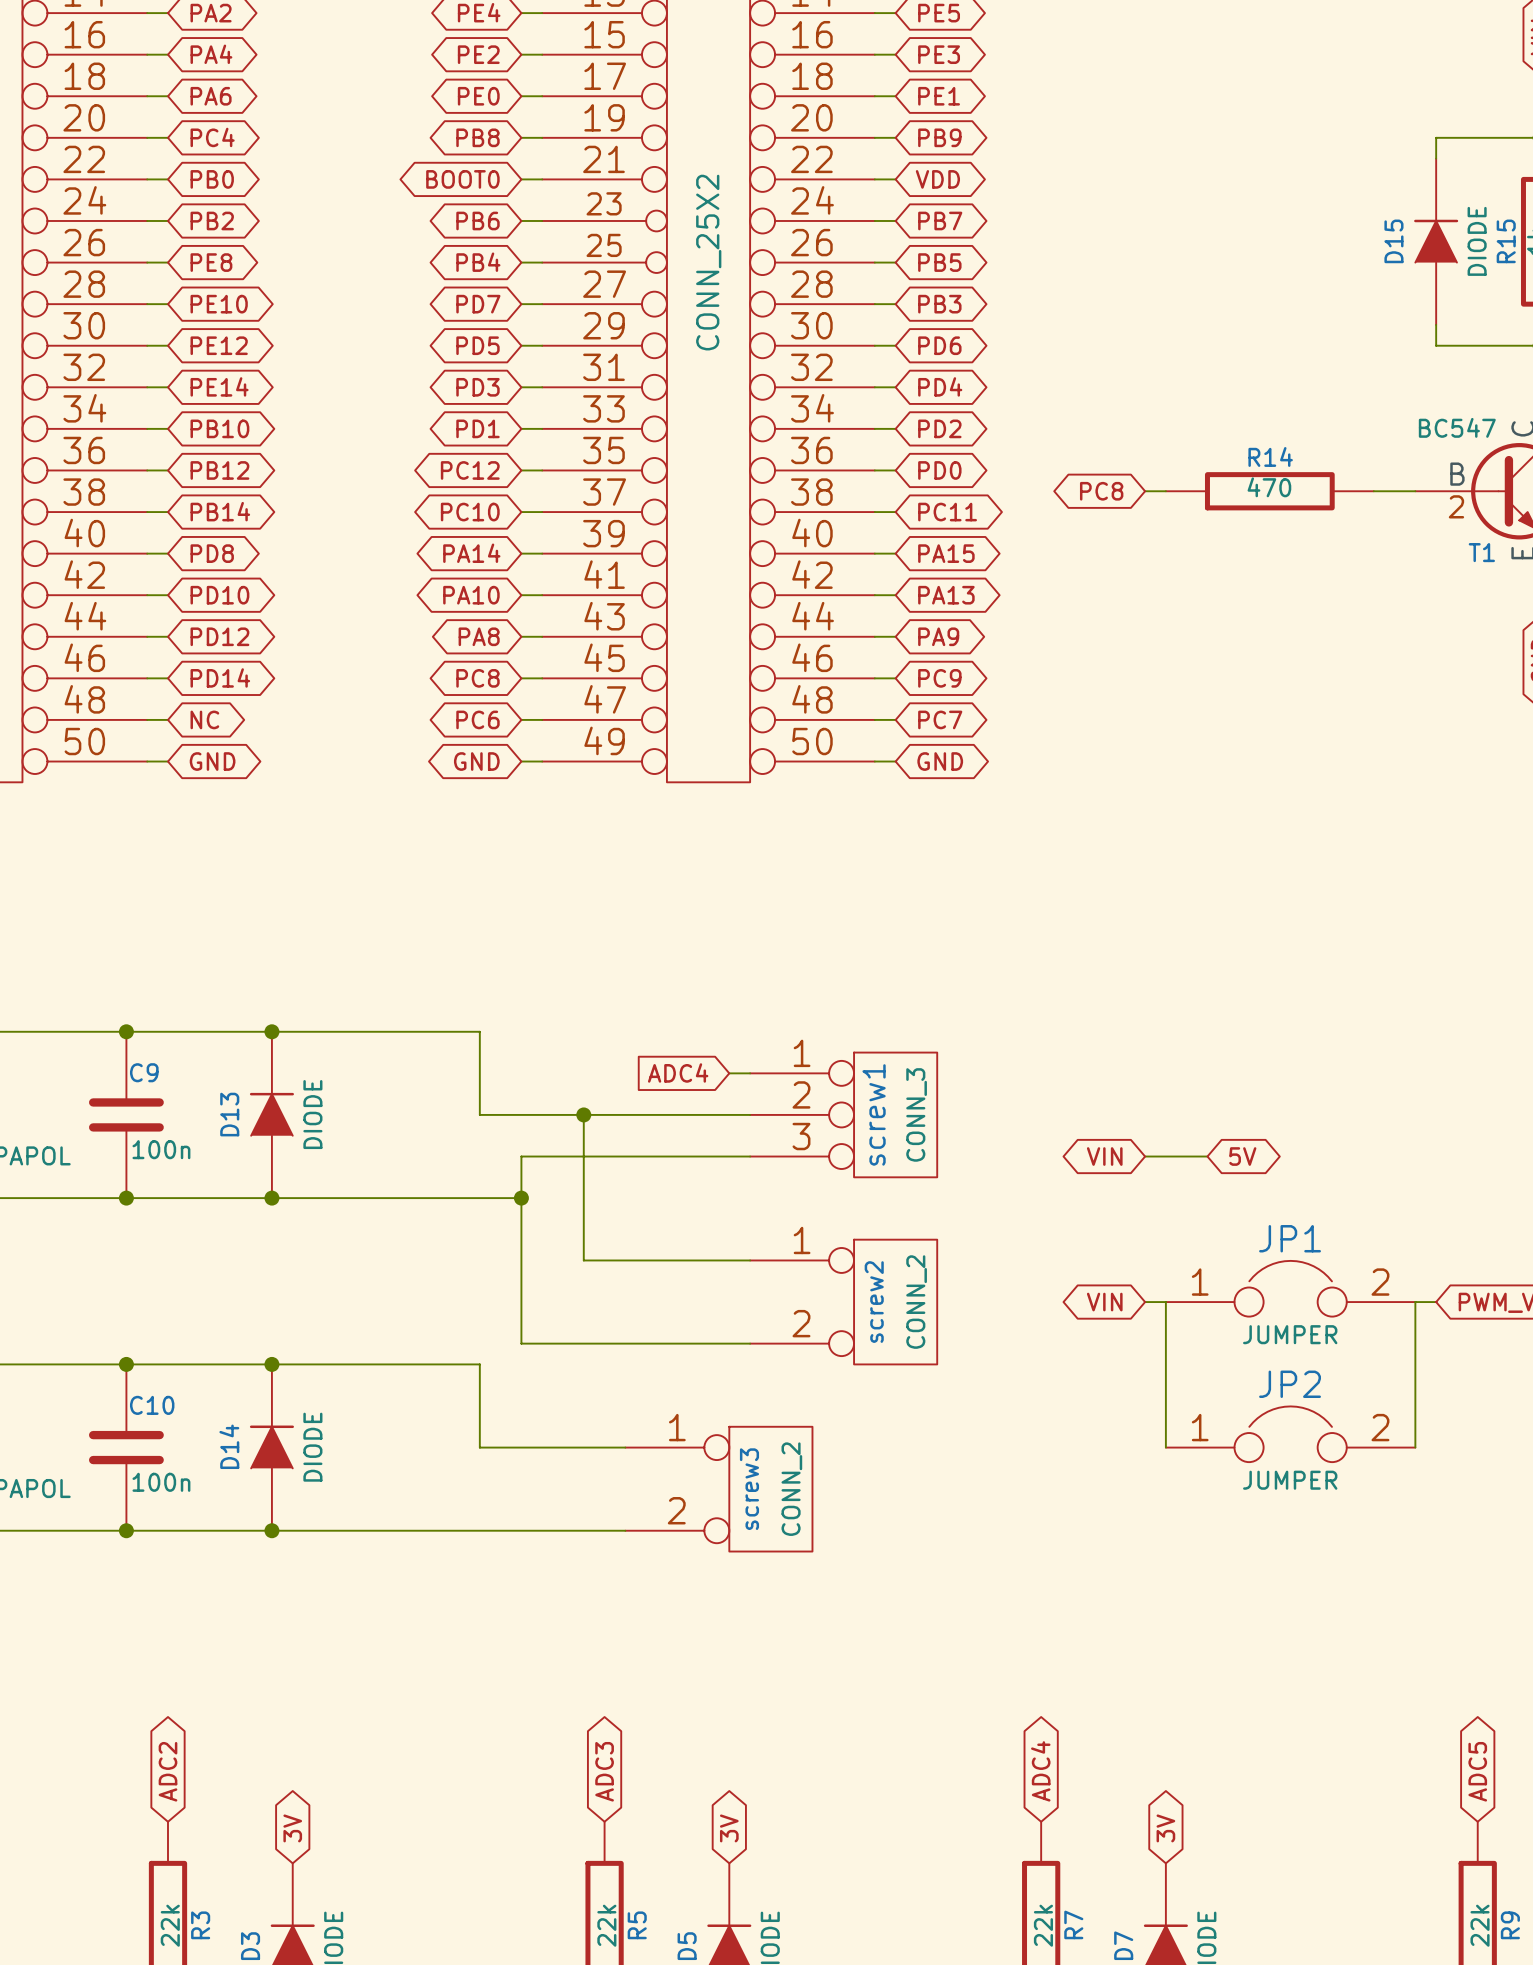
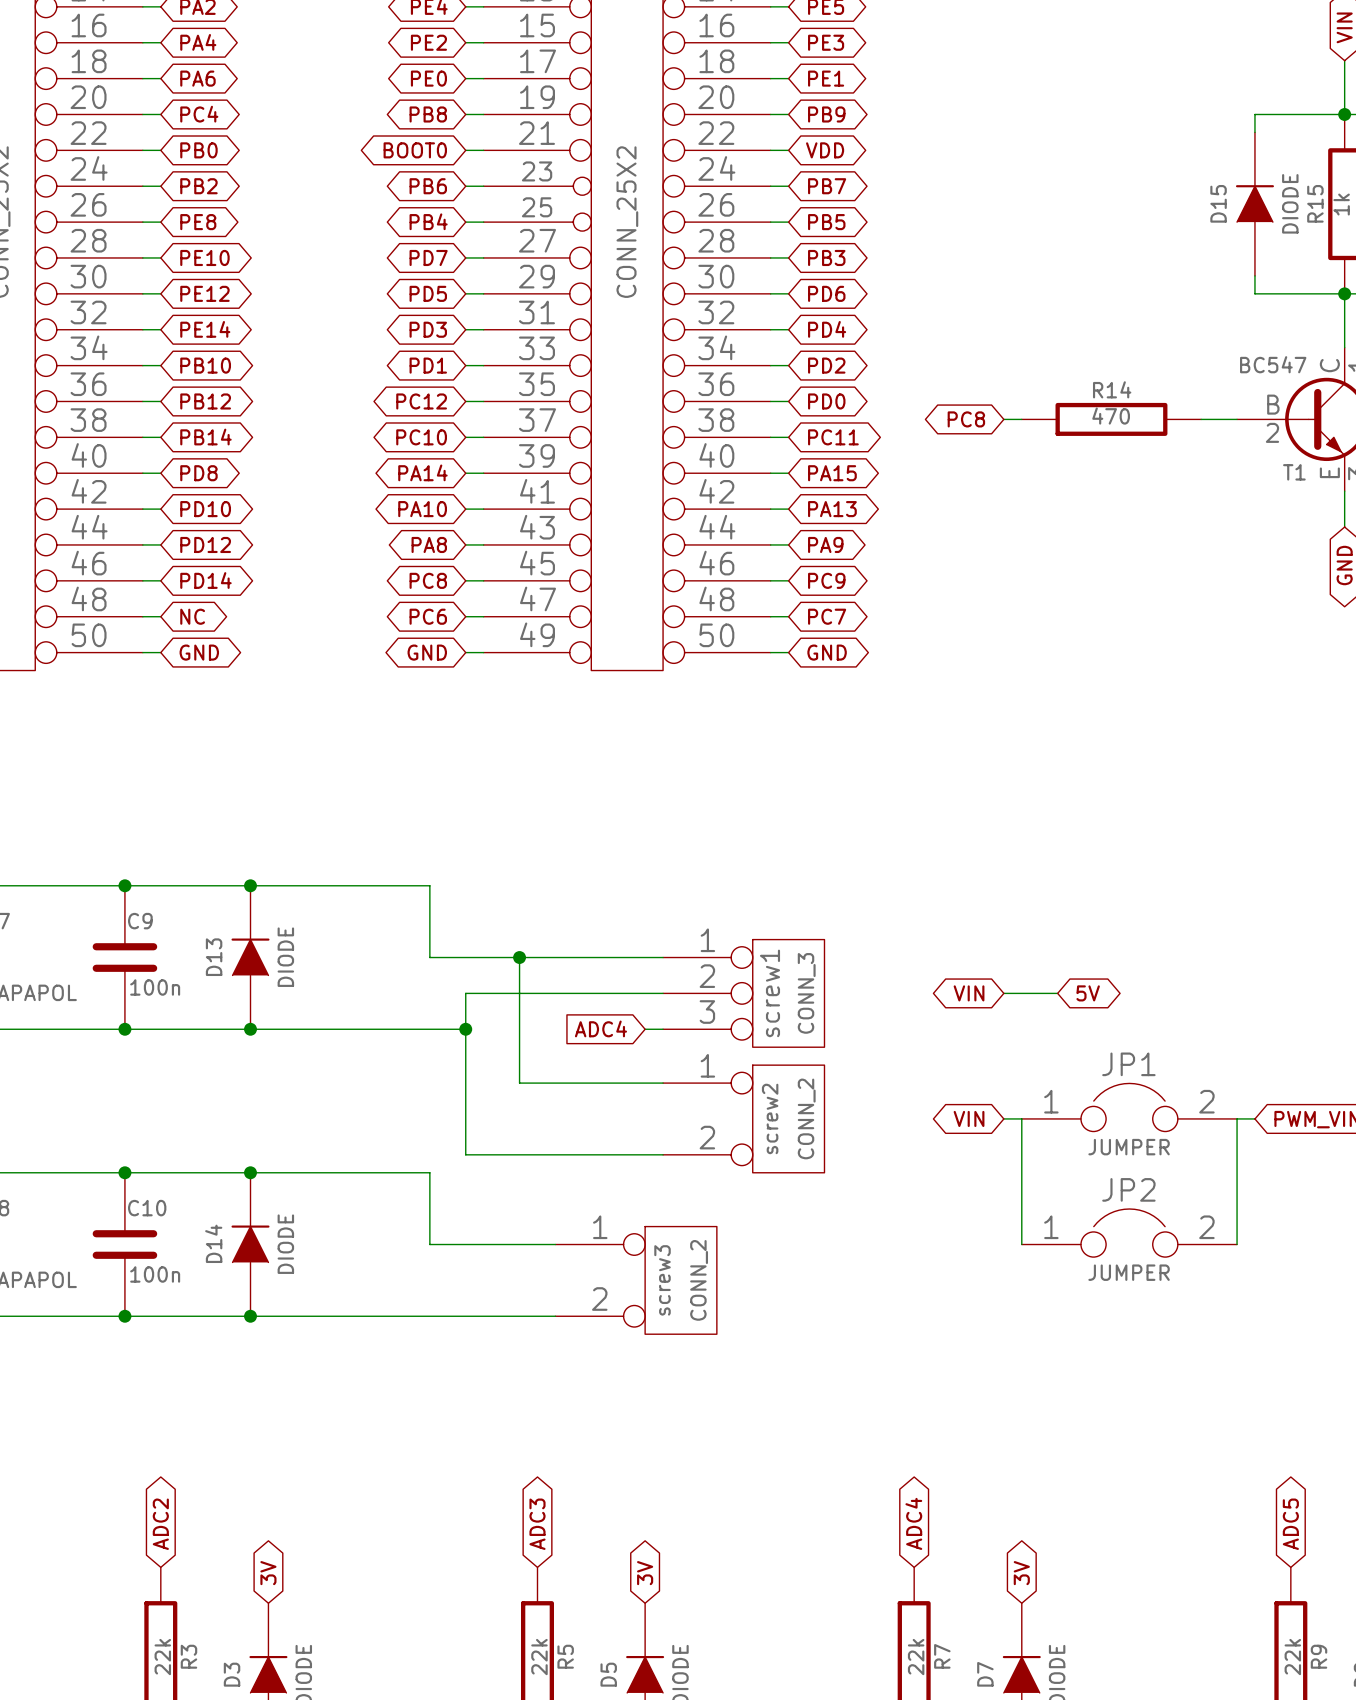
global label position: ADC4 (678, 1072) -> ADC4 (600, 1028)
wire: (729, 1073) (750, 1073) -> (645, 1029) (663, 1029)
screw1 position: (843, 1114) -> (743, 993)

